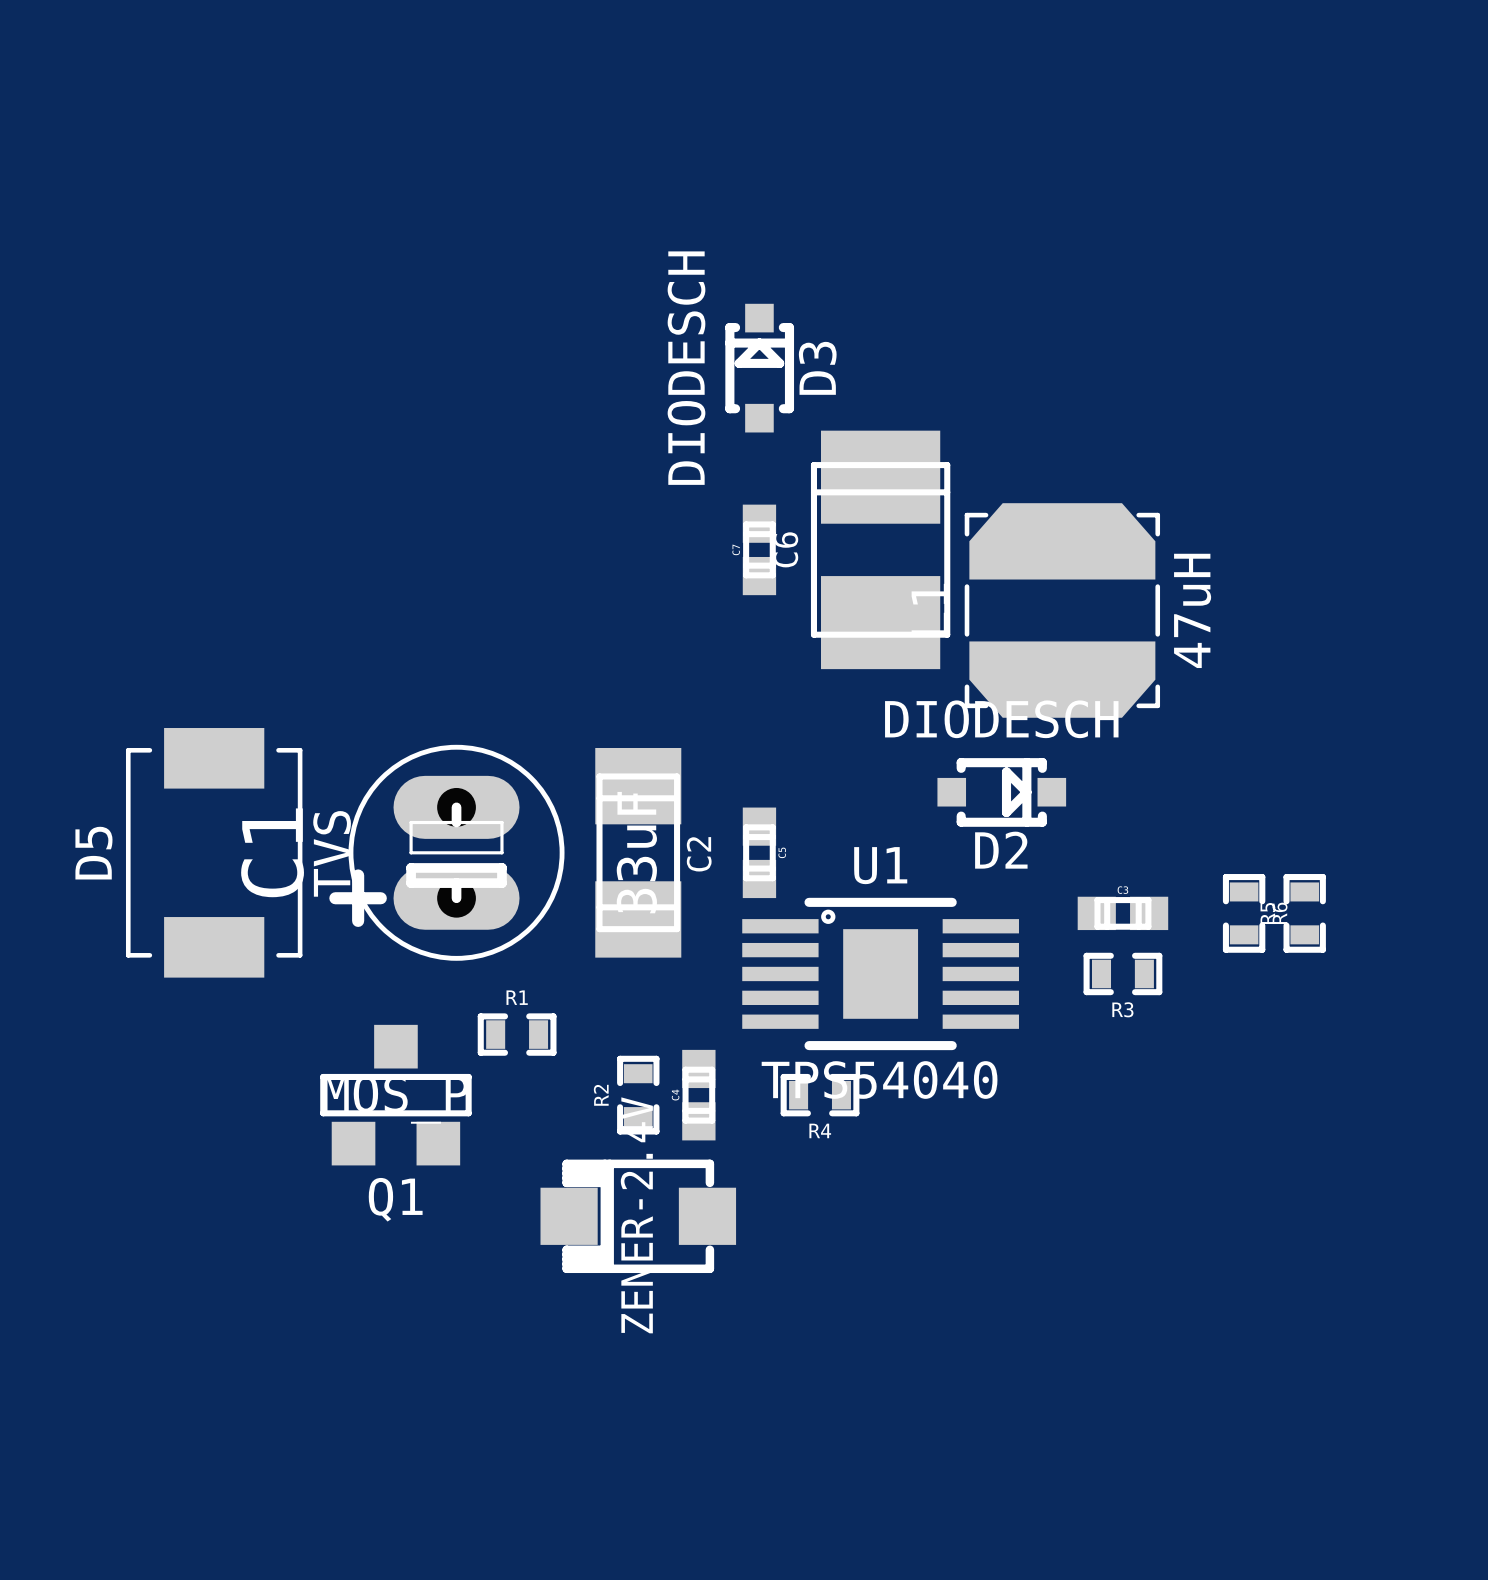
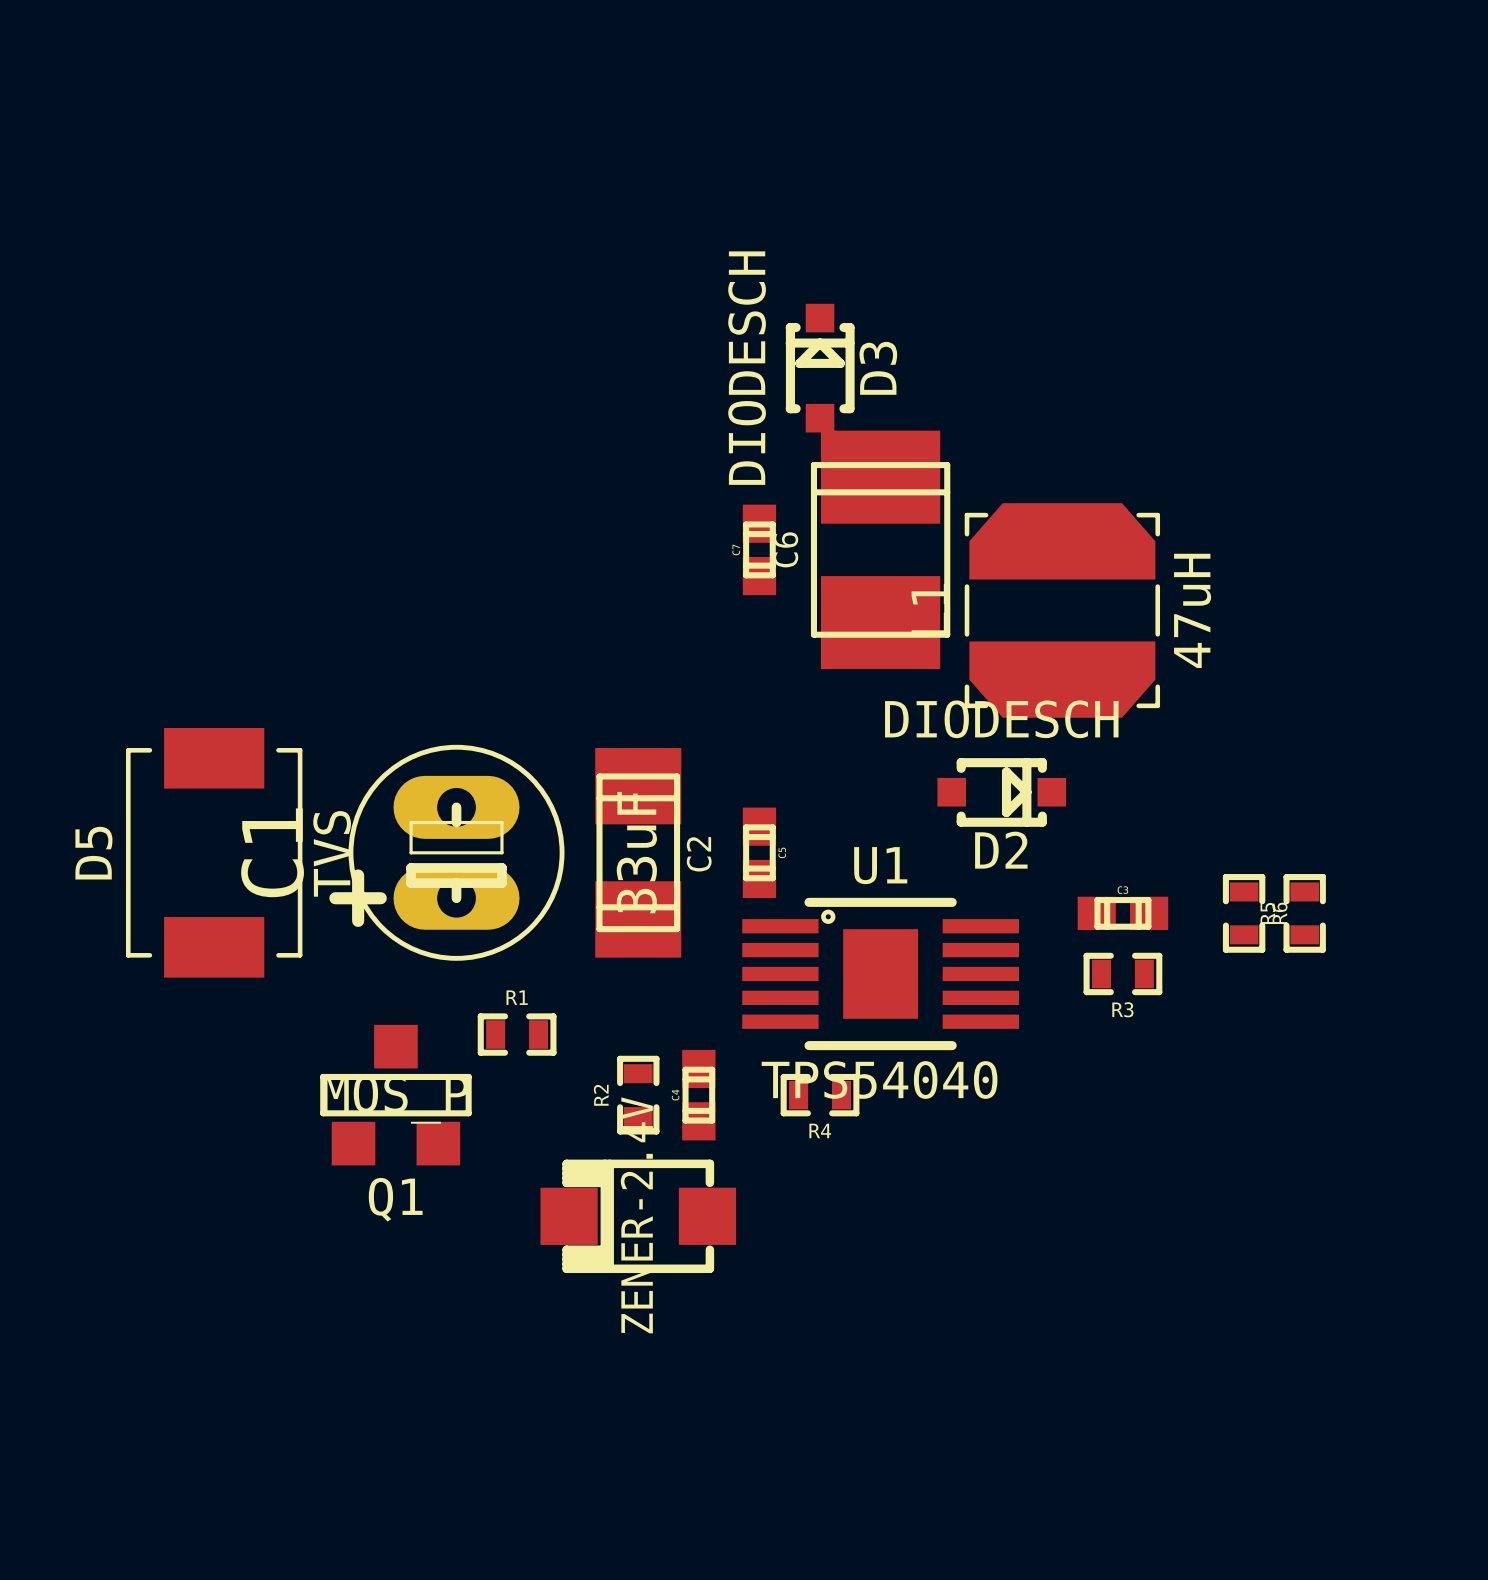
D3 position: (759, 368) -> (820, 368)

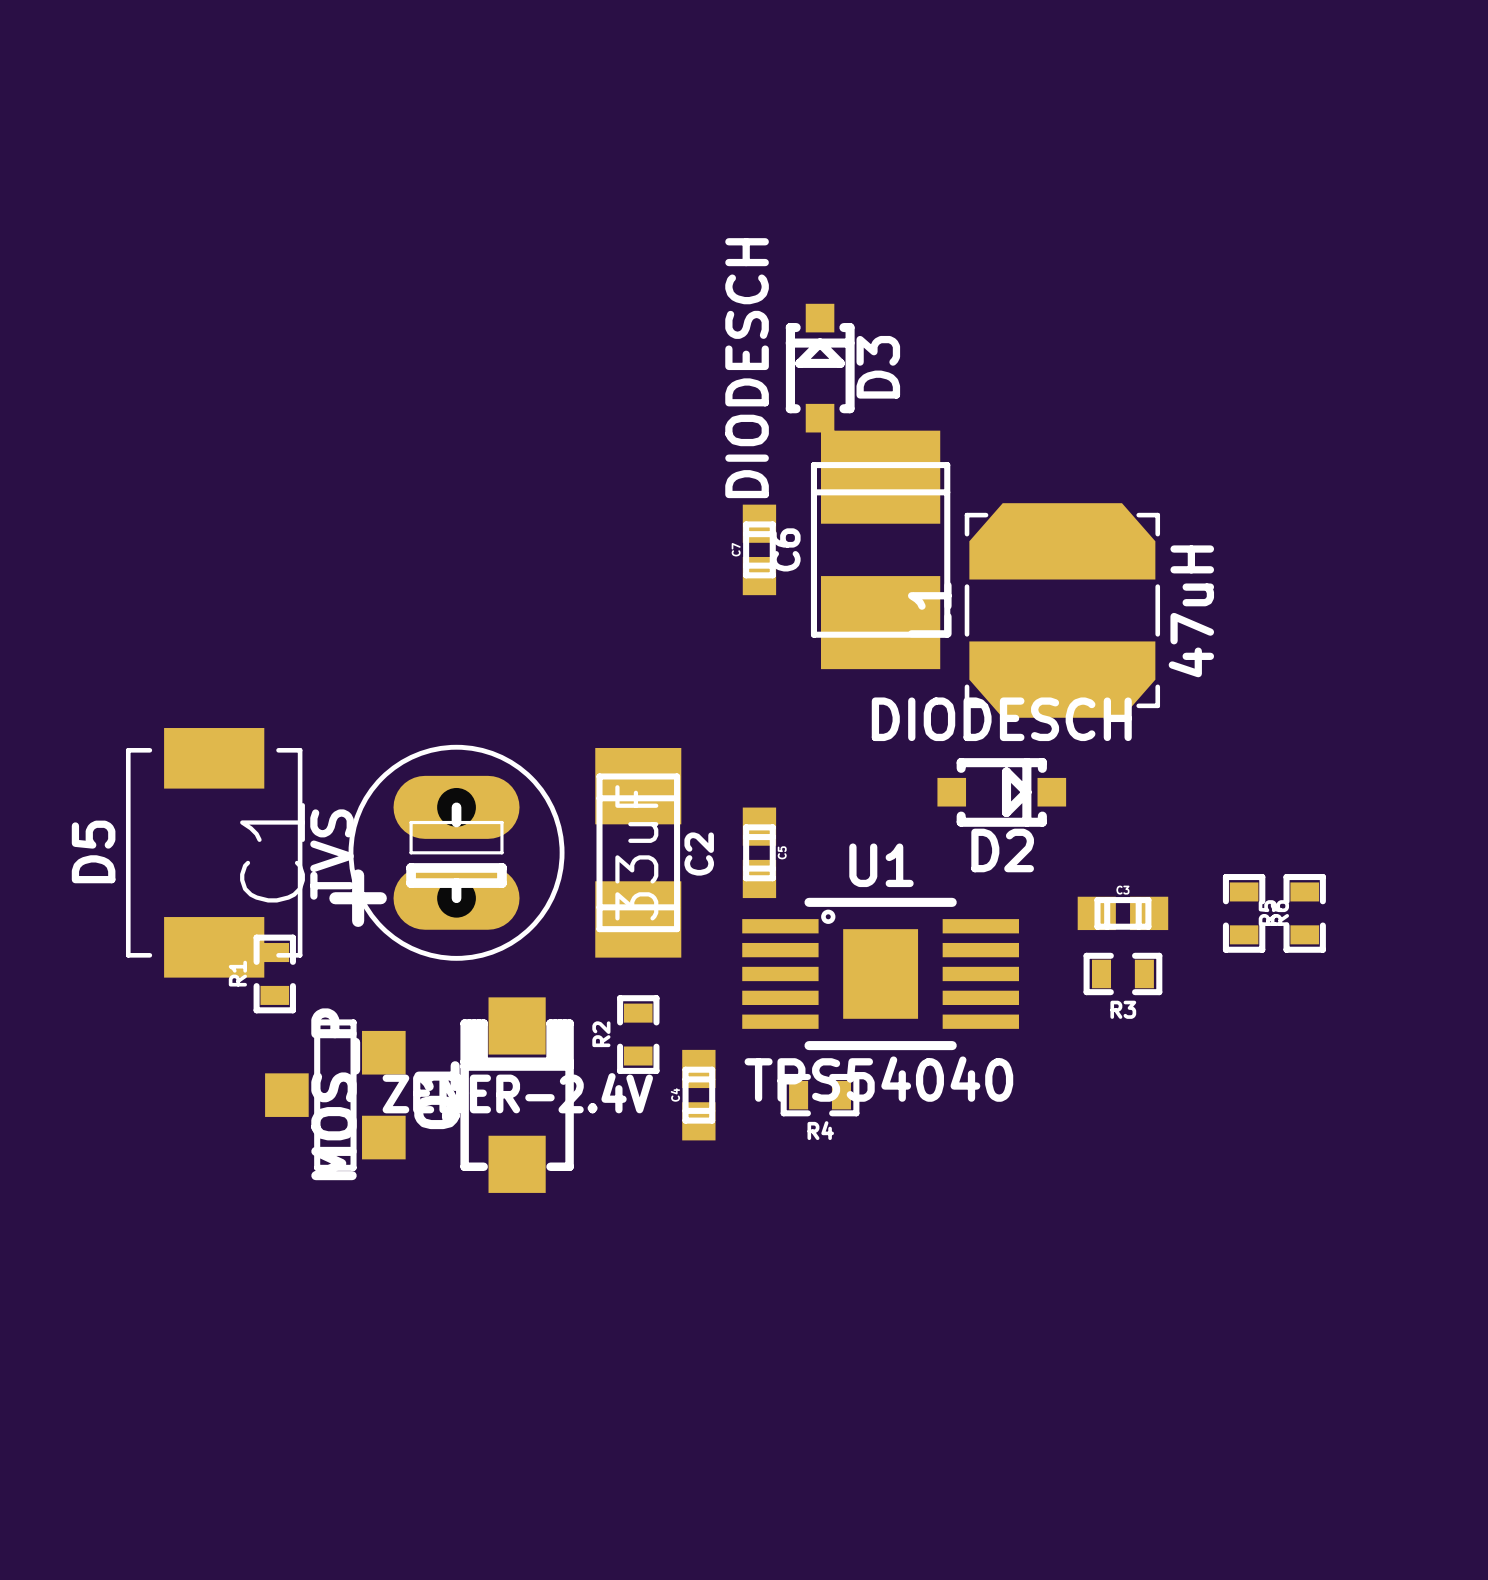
R1 rotation: 0° (517, 1034) -> 90° clockwise (274, 973)
R1 position: (517, 1034) -> (274, 973)
Q1 rotation: 0° (395, 1095) -> 90° counterclockwise (335, 1095)
R2 position: (638, 1095) -> (638, 1034)
part rotation: 0° (638, 1216) -> 90° clockwise (517, 1095)
part position: (638, 1216) -> (517, 1095)

